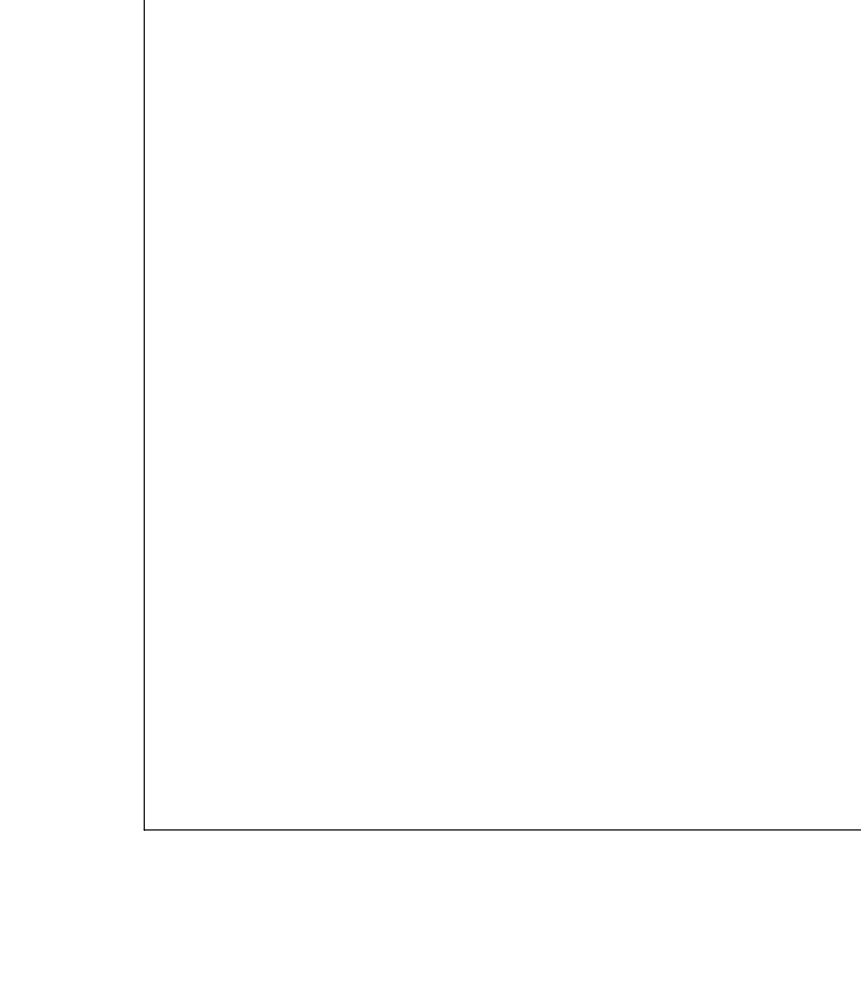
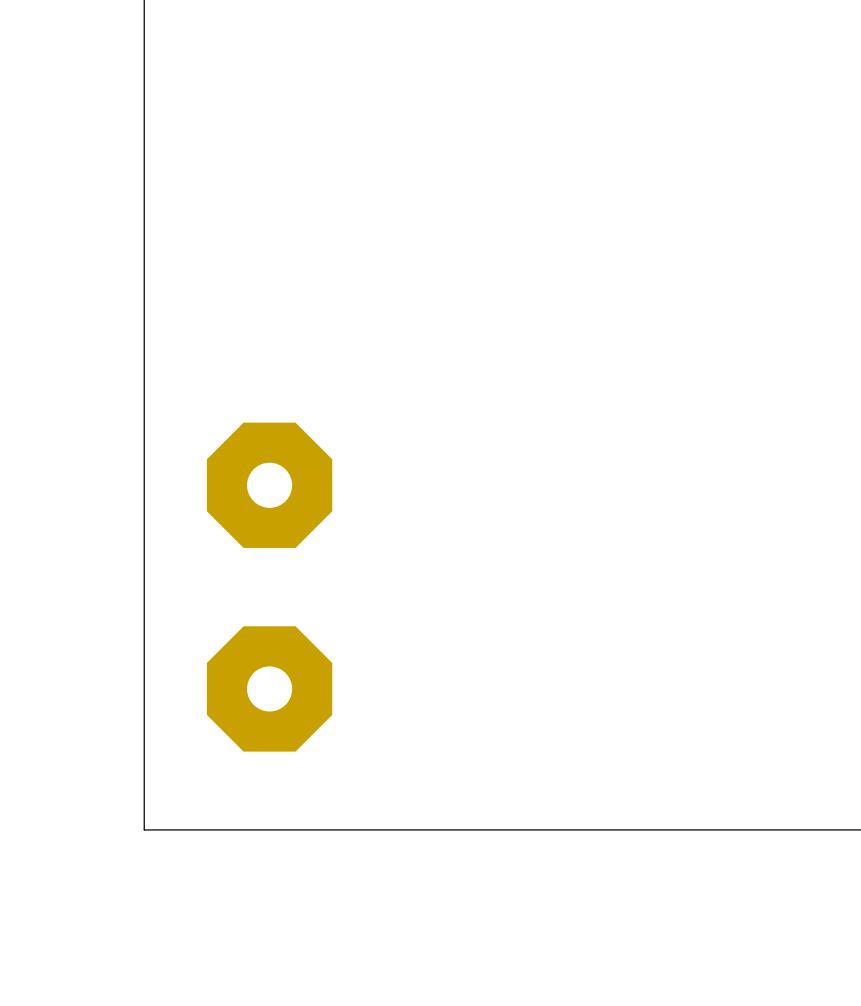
part: none -> (269, 485)
part: none -> (269, 688)

